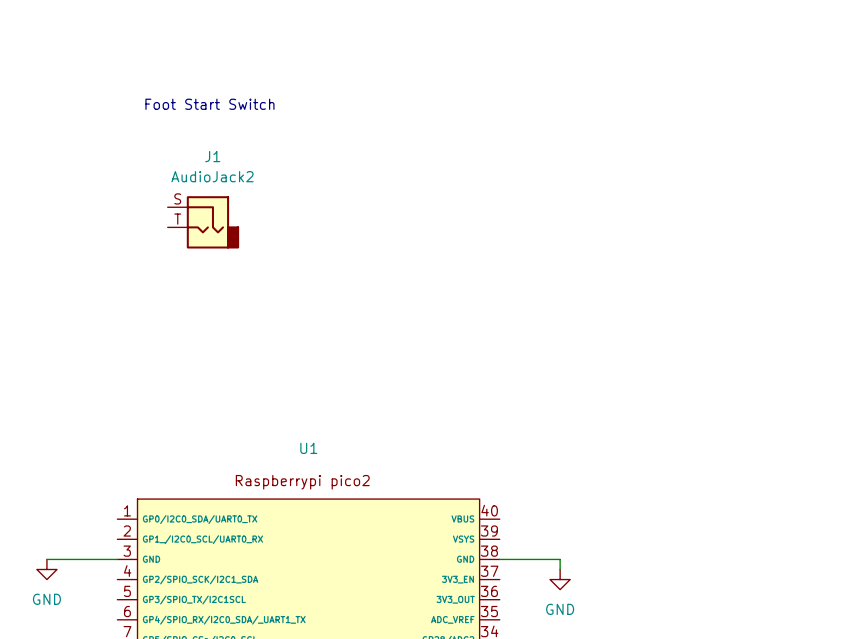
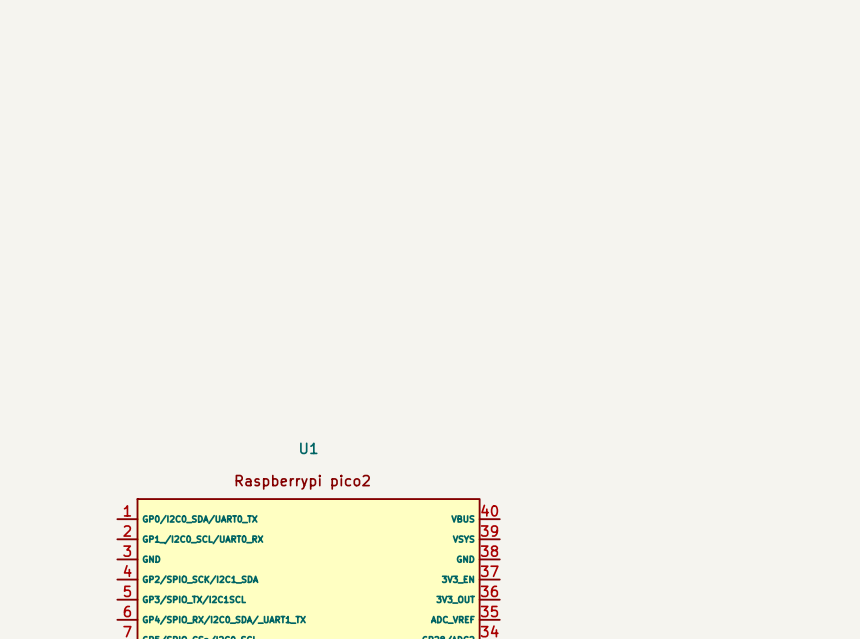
text: Foot Start Switch (209, 104) -> none
J1: AudioJack2 (203, 222) -> none
wire: (46, 559) (117, 559) -> none
wire: (499, 559) (560, 559) (560, 569) -> none
power symbol: GND (46, 569) -> none
power symbol: GND (560, 579) -> none

